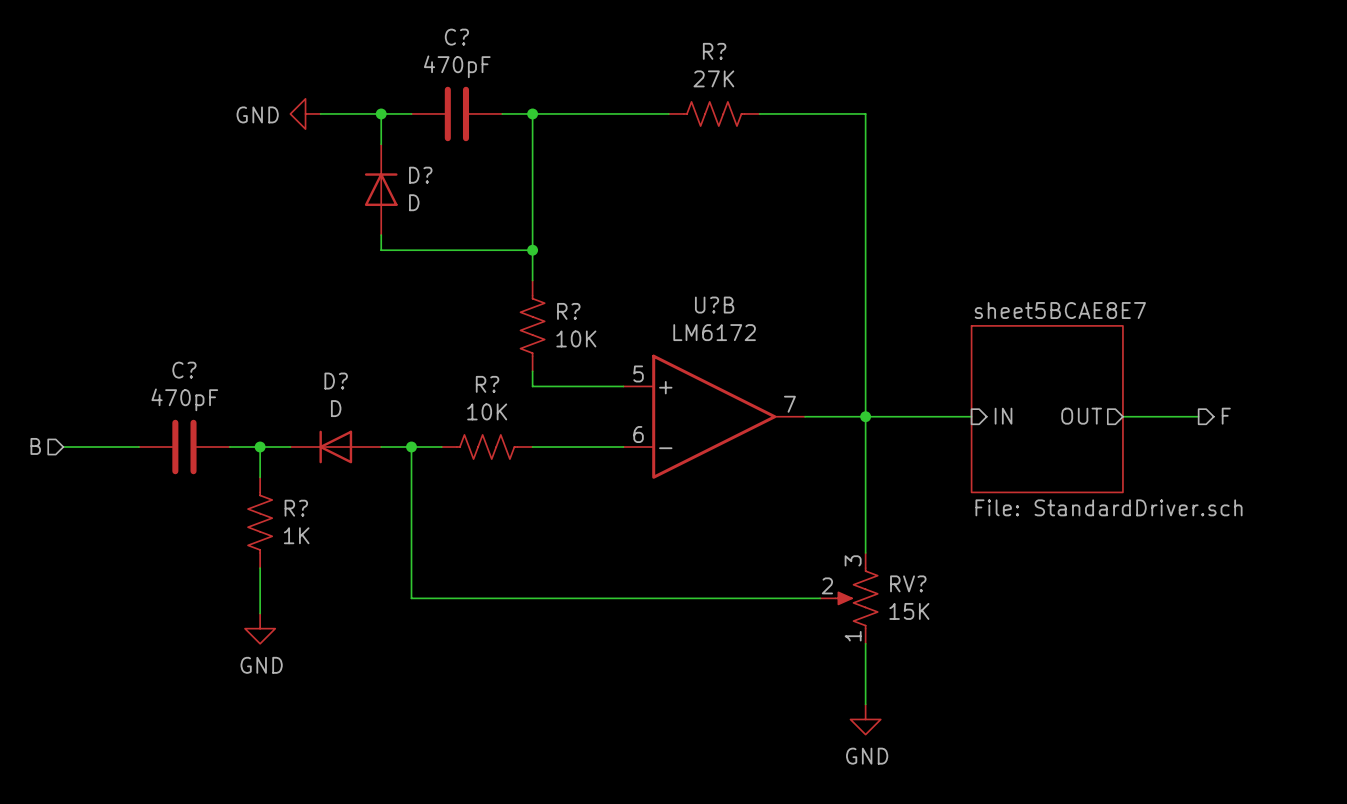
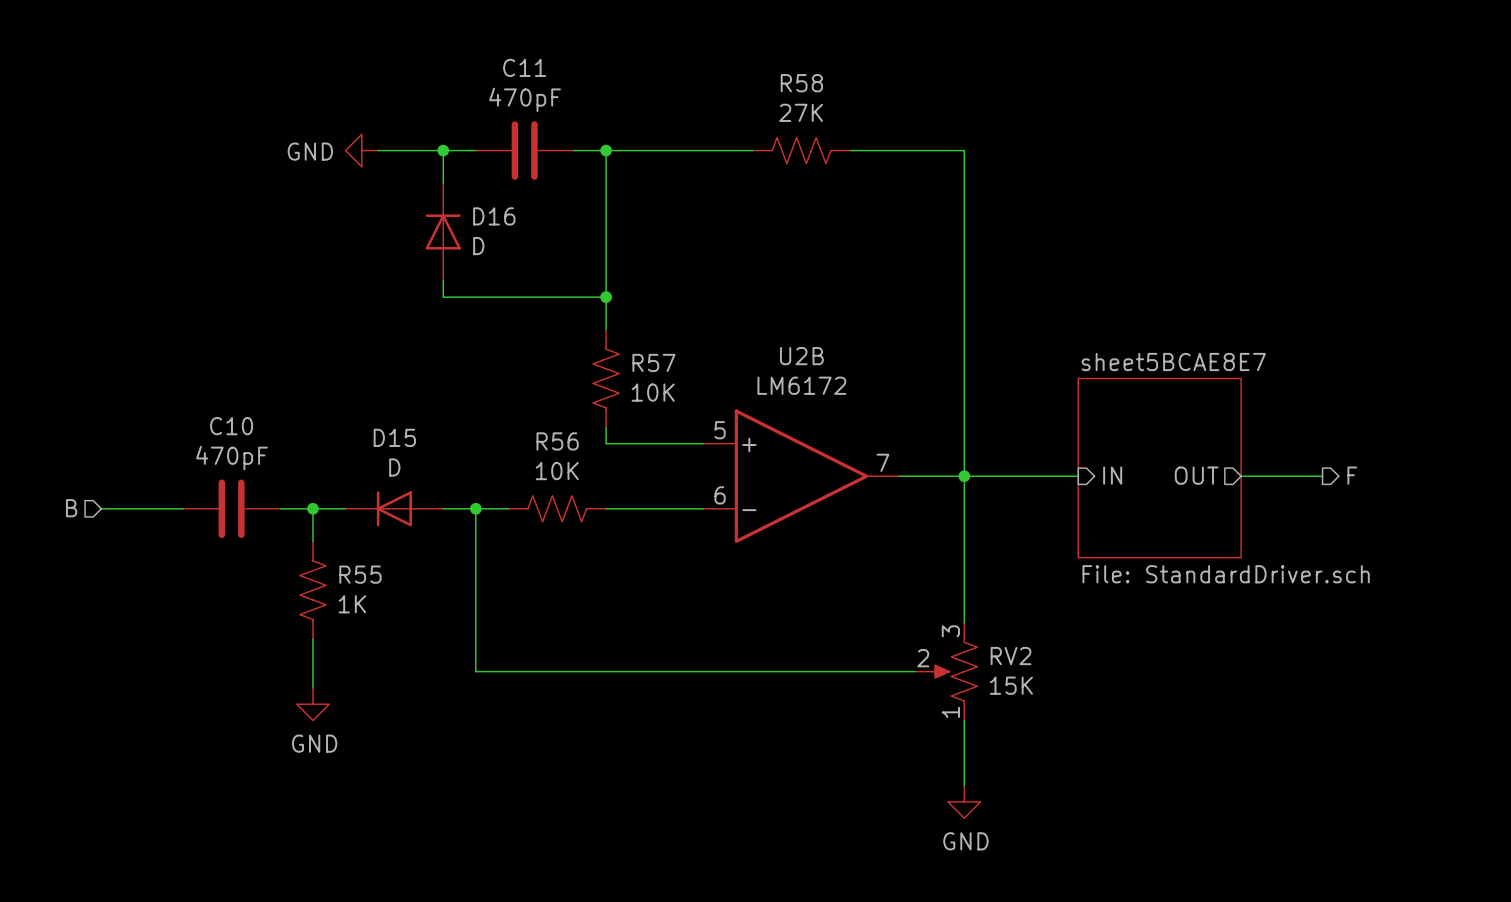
C? name: C? (456, 37) -> C11 (524, 67)
R? name: R? (714, 51) -> R58 (801, 83)
D? name: D? (420, 175) -> D16 (494, 216)
U?B name: U?B (714, 305) -> U2B (801, 356)
R? name: R? (568, 311) -> R57 (653, 362)
C? name: C? (184, 370) -> C10 (231, 426)
D? name: D? (336, 381) -> D15 (394, 437)
R? name: R? (487, 384) -> R56 (557, 441)
R? name: R? (296, 508) -> R55 (360, 574)
RV? name: RV? (908, 583) -> RV2 (1011, 656)

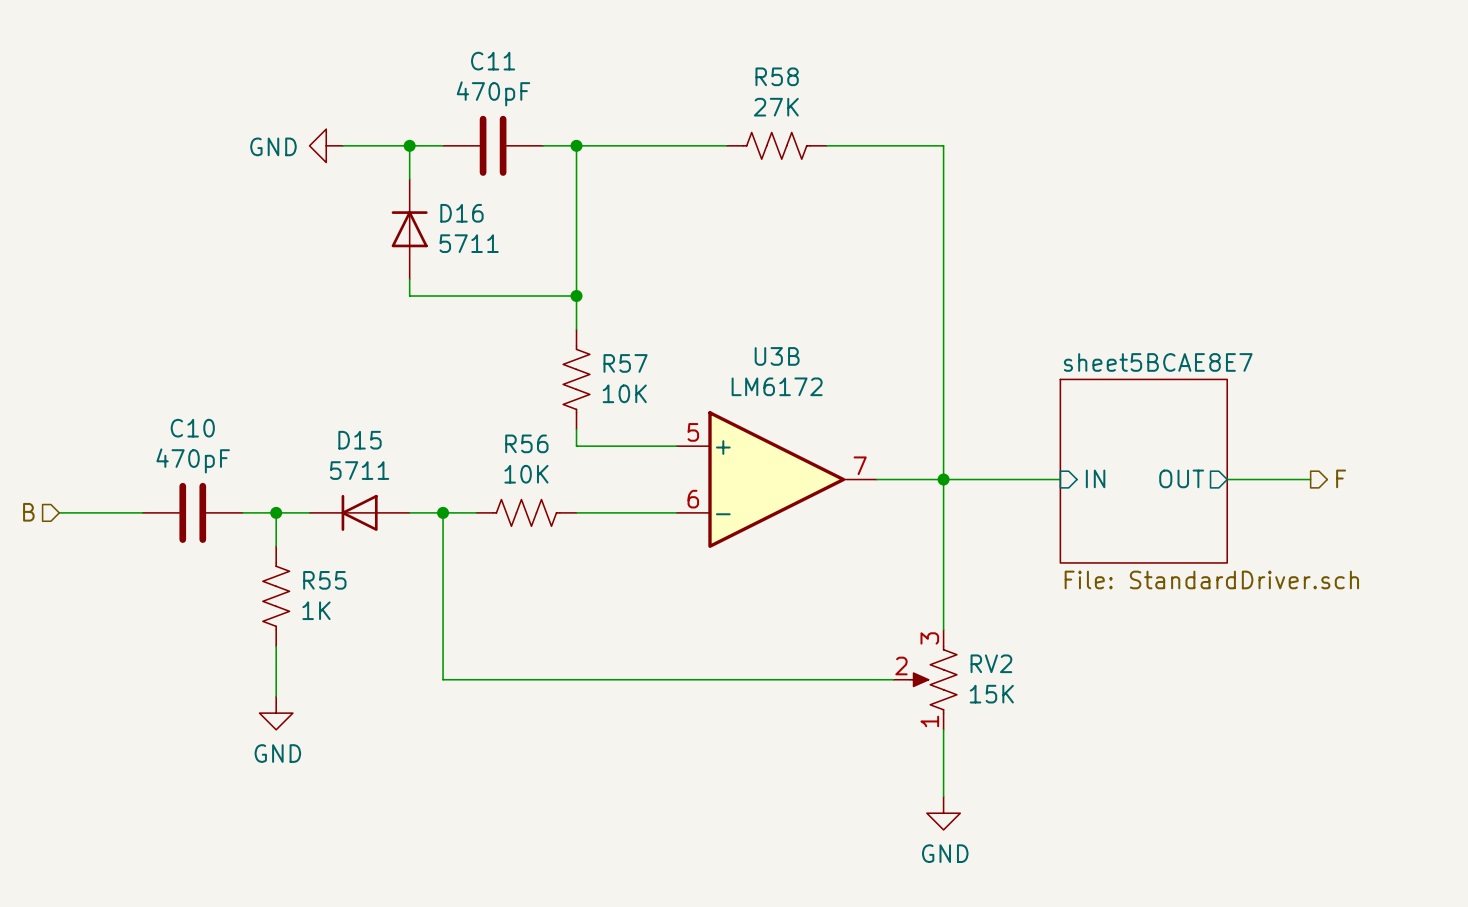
D16 value: D (478, 246) -> 5711 (469, 243)
U2B name: U2B (801, 356) -> U3B (777, 356)
D15 value: D (394, 467) -> 5711 (359, 470)

